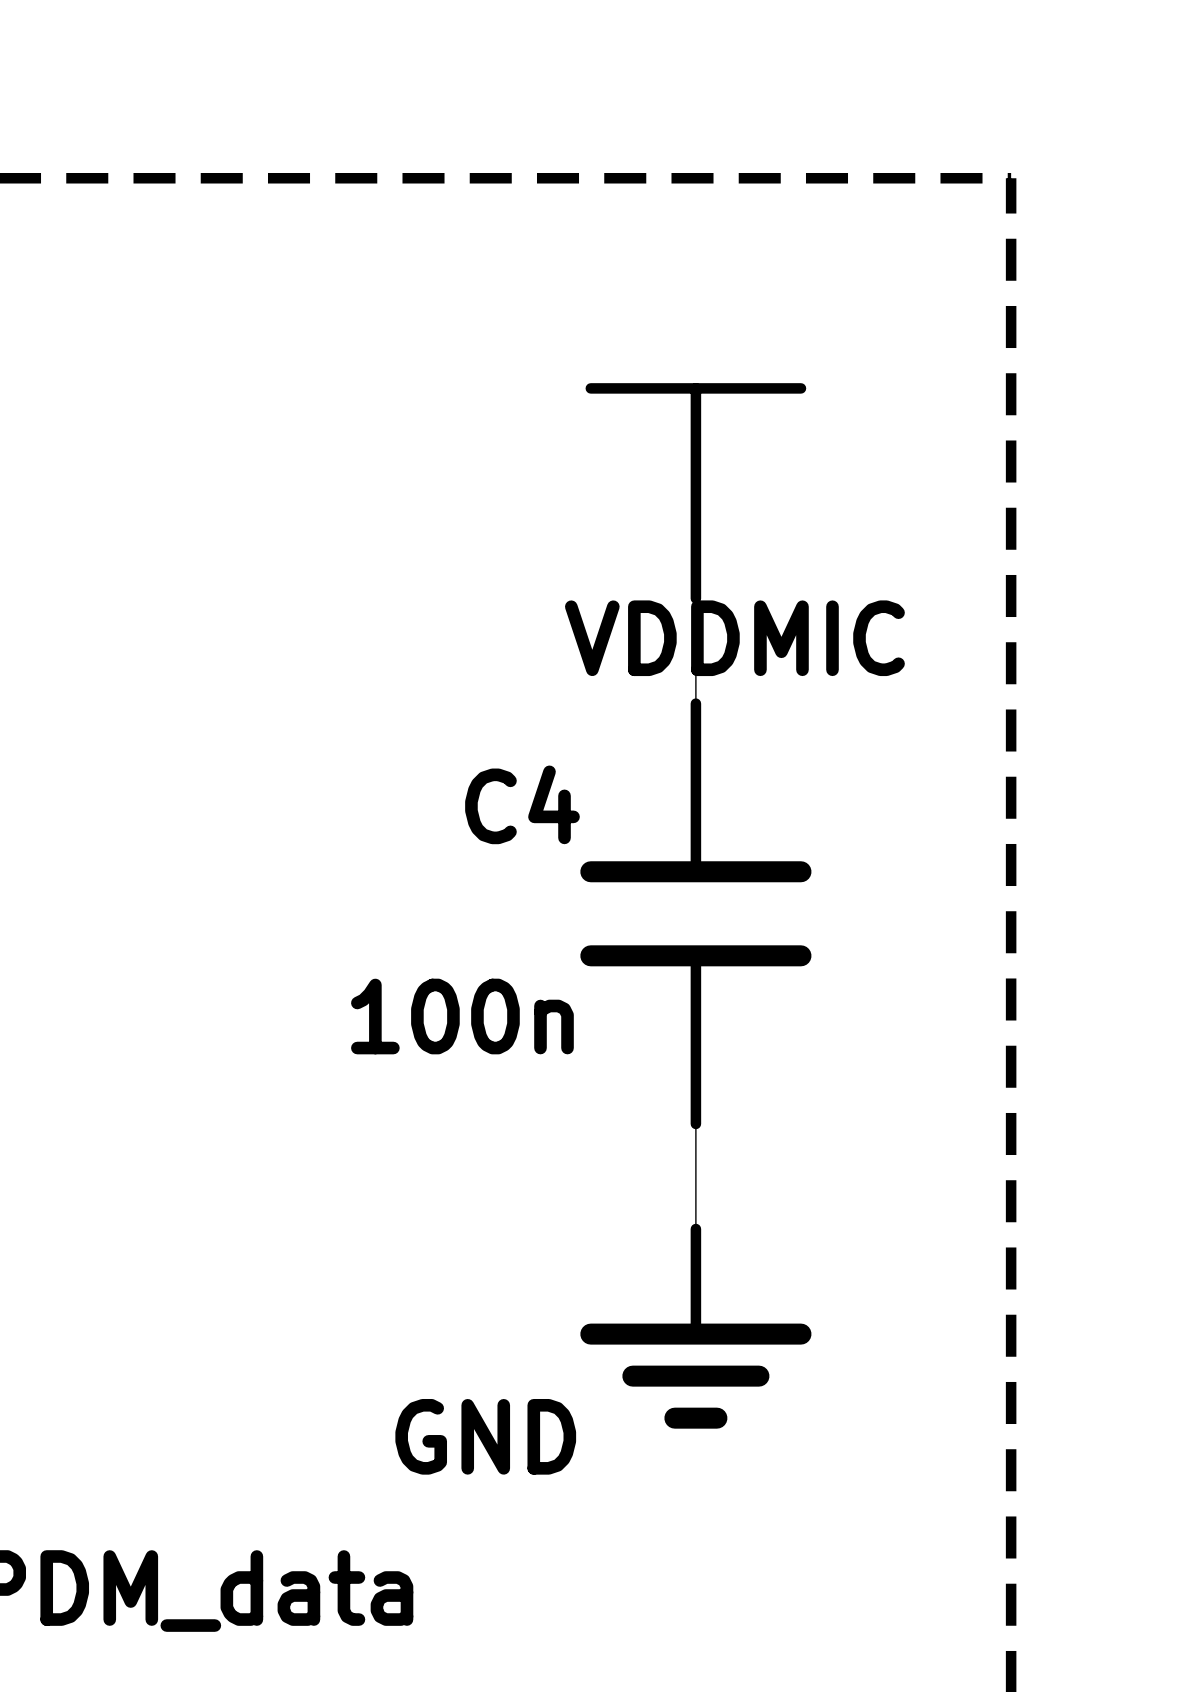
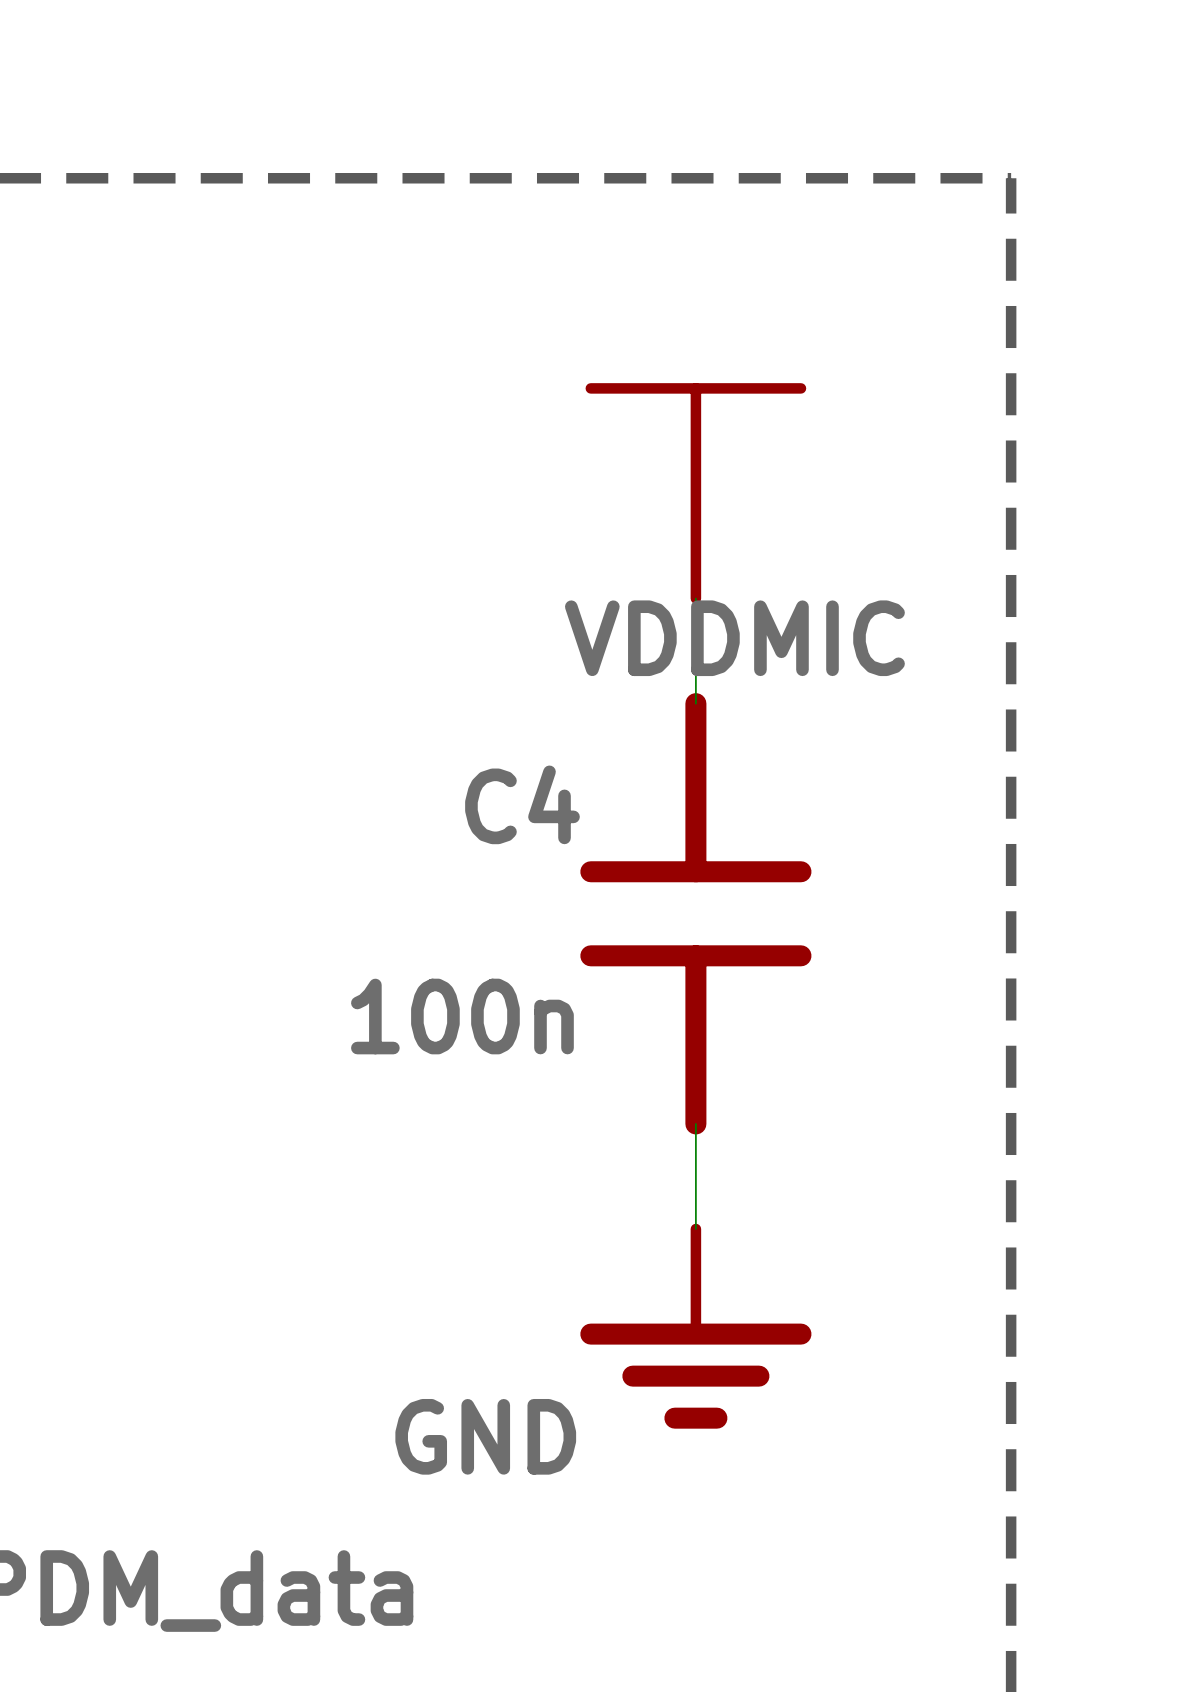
C4 symbol: [580, 698, 812, 1130] -> [580, 693, 812, 1135]

